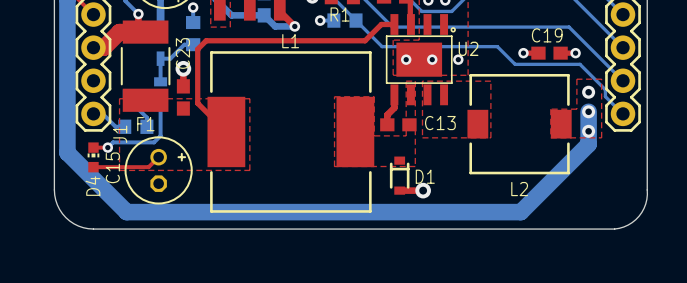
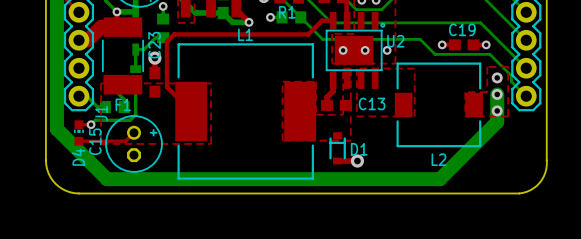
bottom track: none -> (116, 11) (135, 11)

